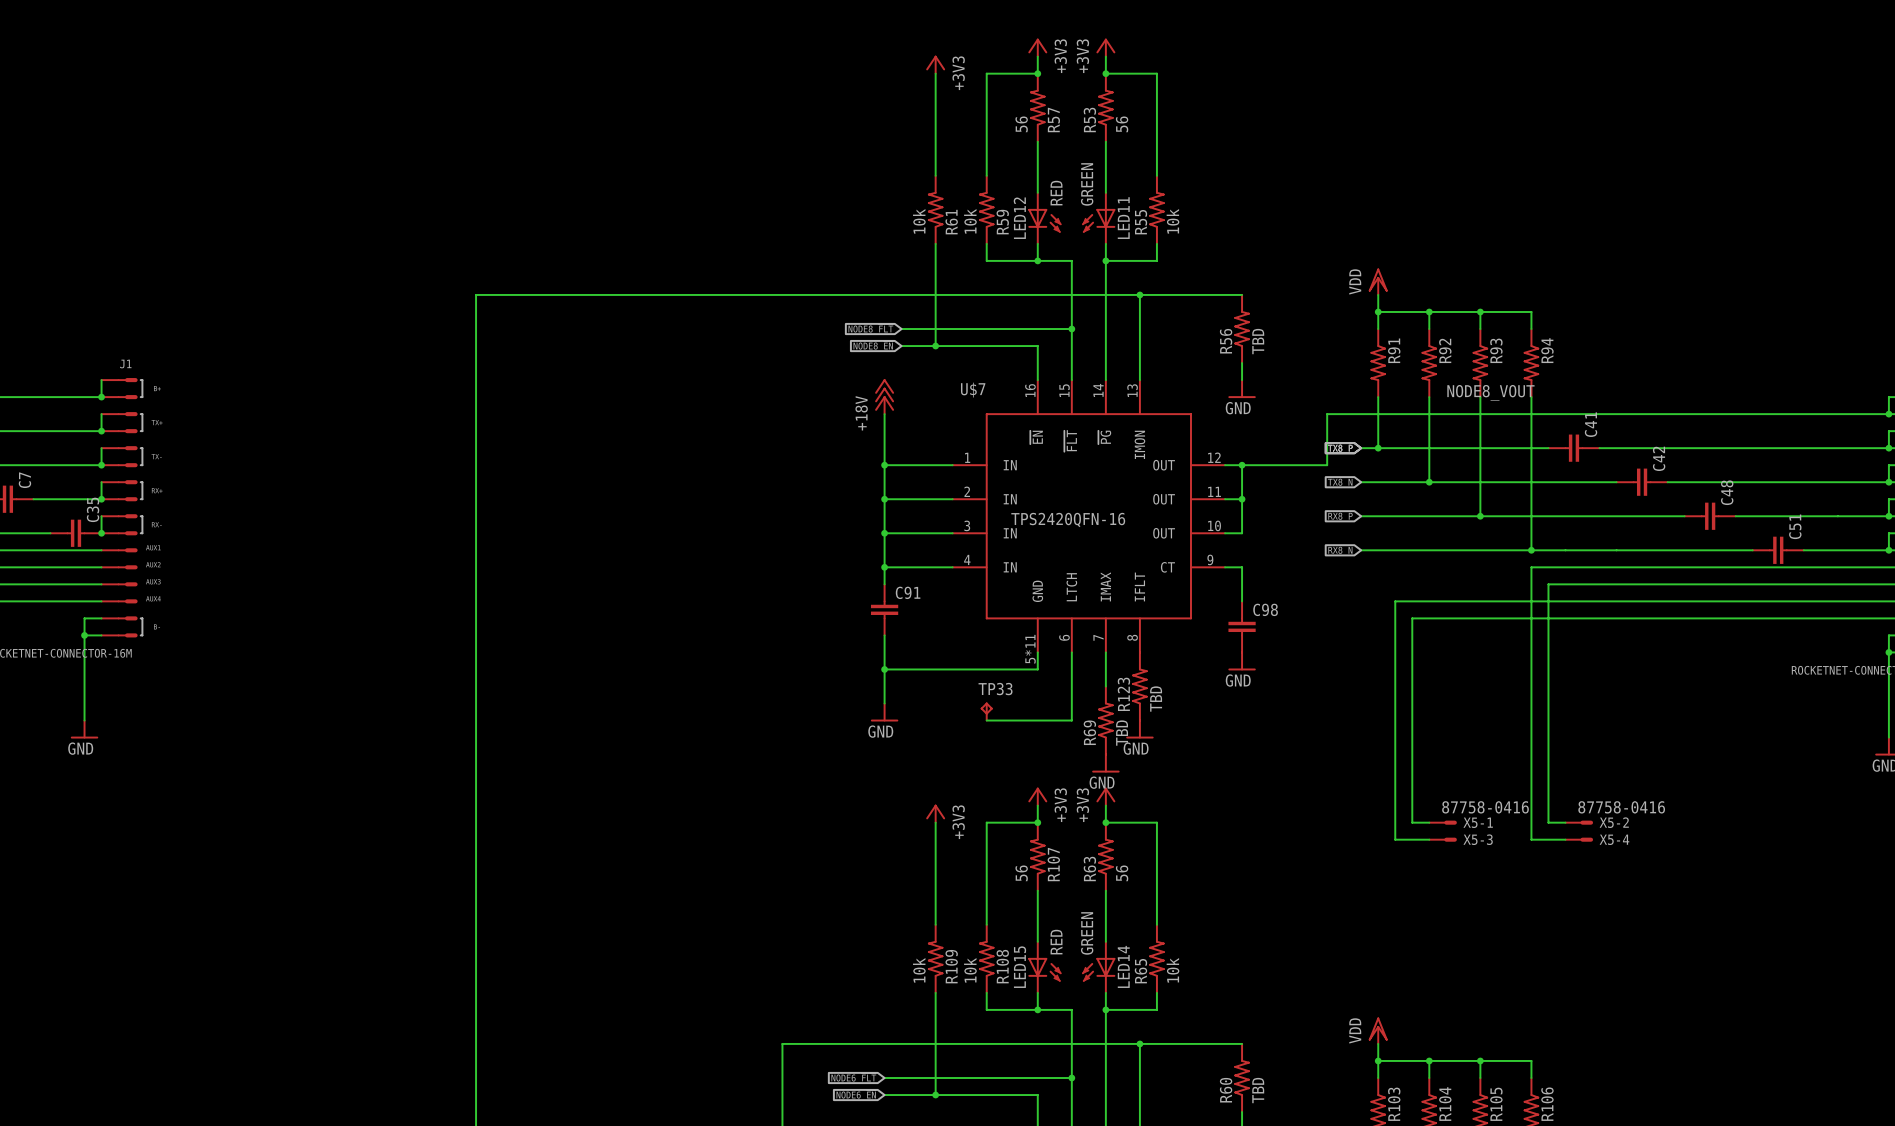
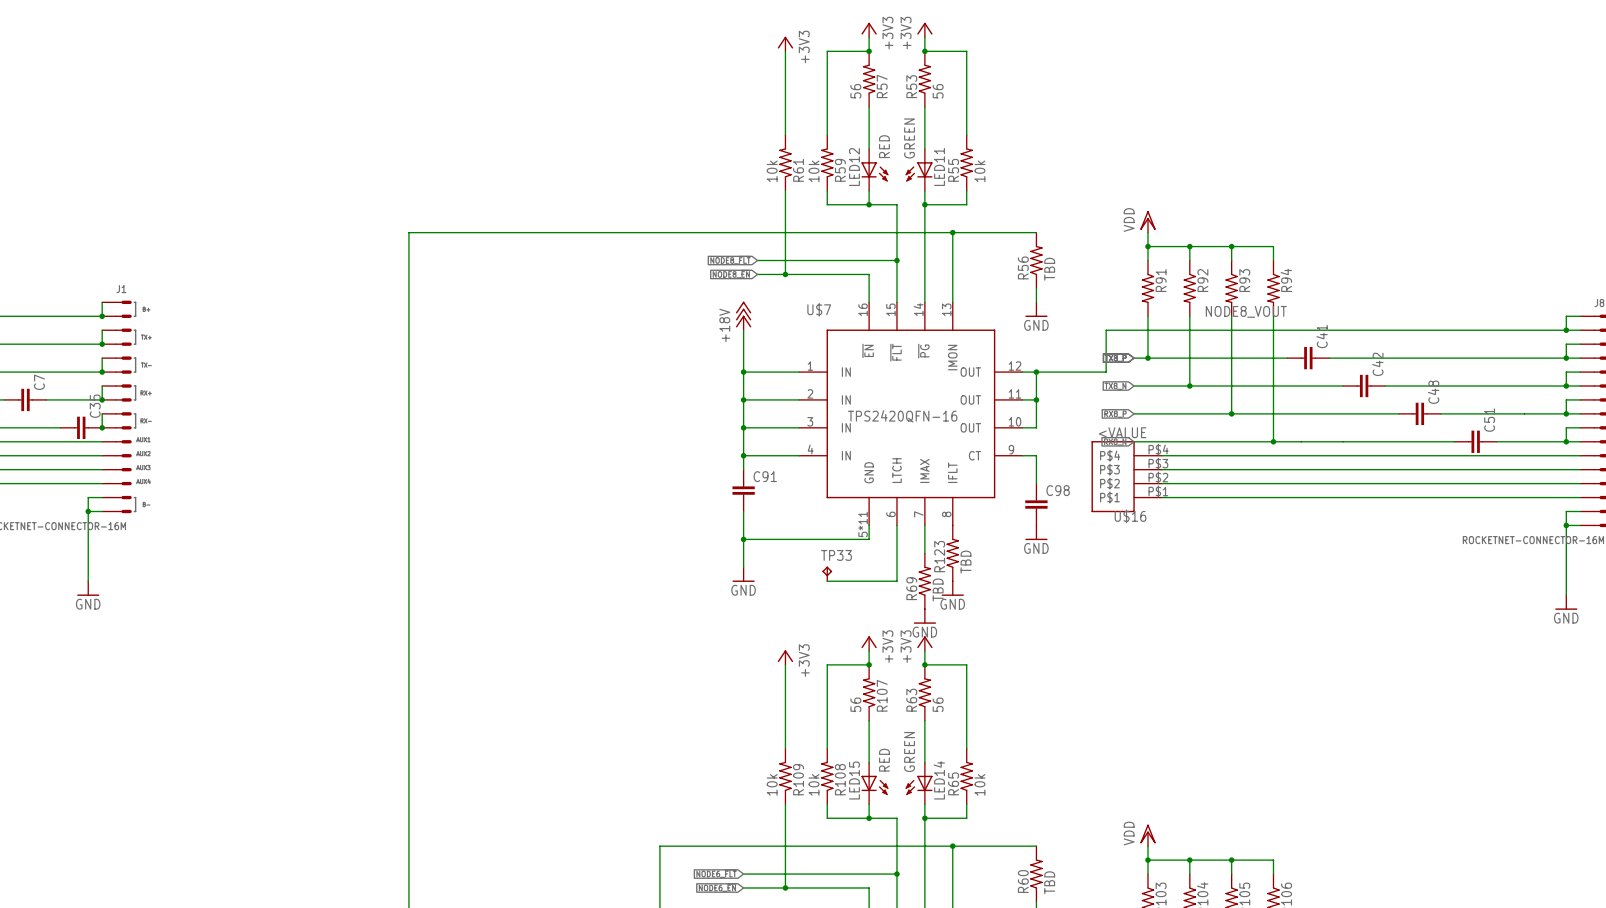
wire: (1531, 567) (1531, 839) (1565, 839) -> (1273, 455) (1161, 455)
wire: (1548, 584) (1548, 822) (1565, 822) -> (1287, 469) (1161, 469)
U$16: none -> (1126, 476)
wire: (1395, 601) (1395, 839) (1429, 839) -> none
wire: (1412, 618) (1412, 822) (1429, 822) -> (1175, 497) (1161, 497)
X5-1: 87758-0416 (1443, 822) -> none
X5-2: 87758-0416 (1579, 822) -> none
X5-3: (1443, 839) -> none
X5-4: (1579, 839) -> none

